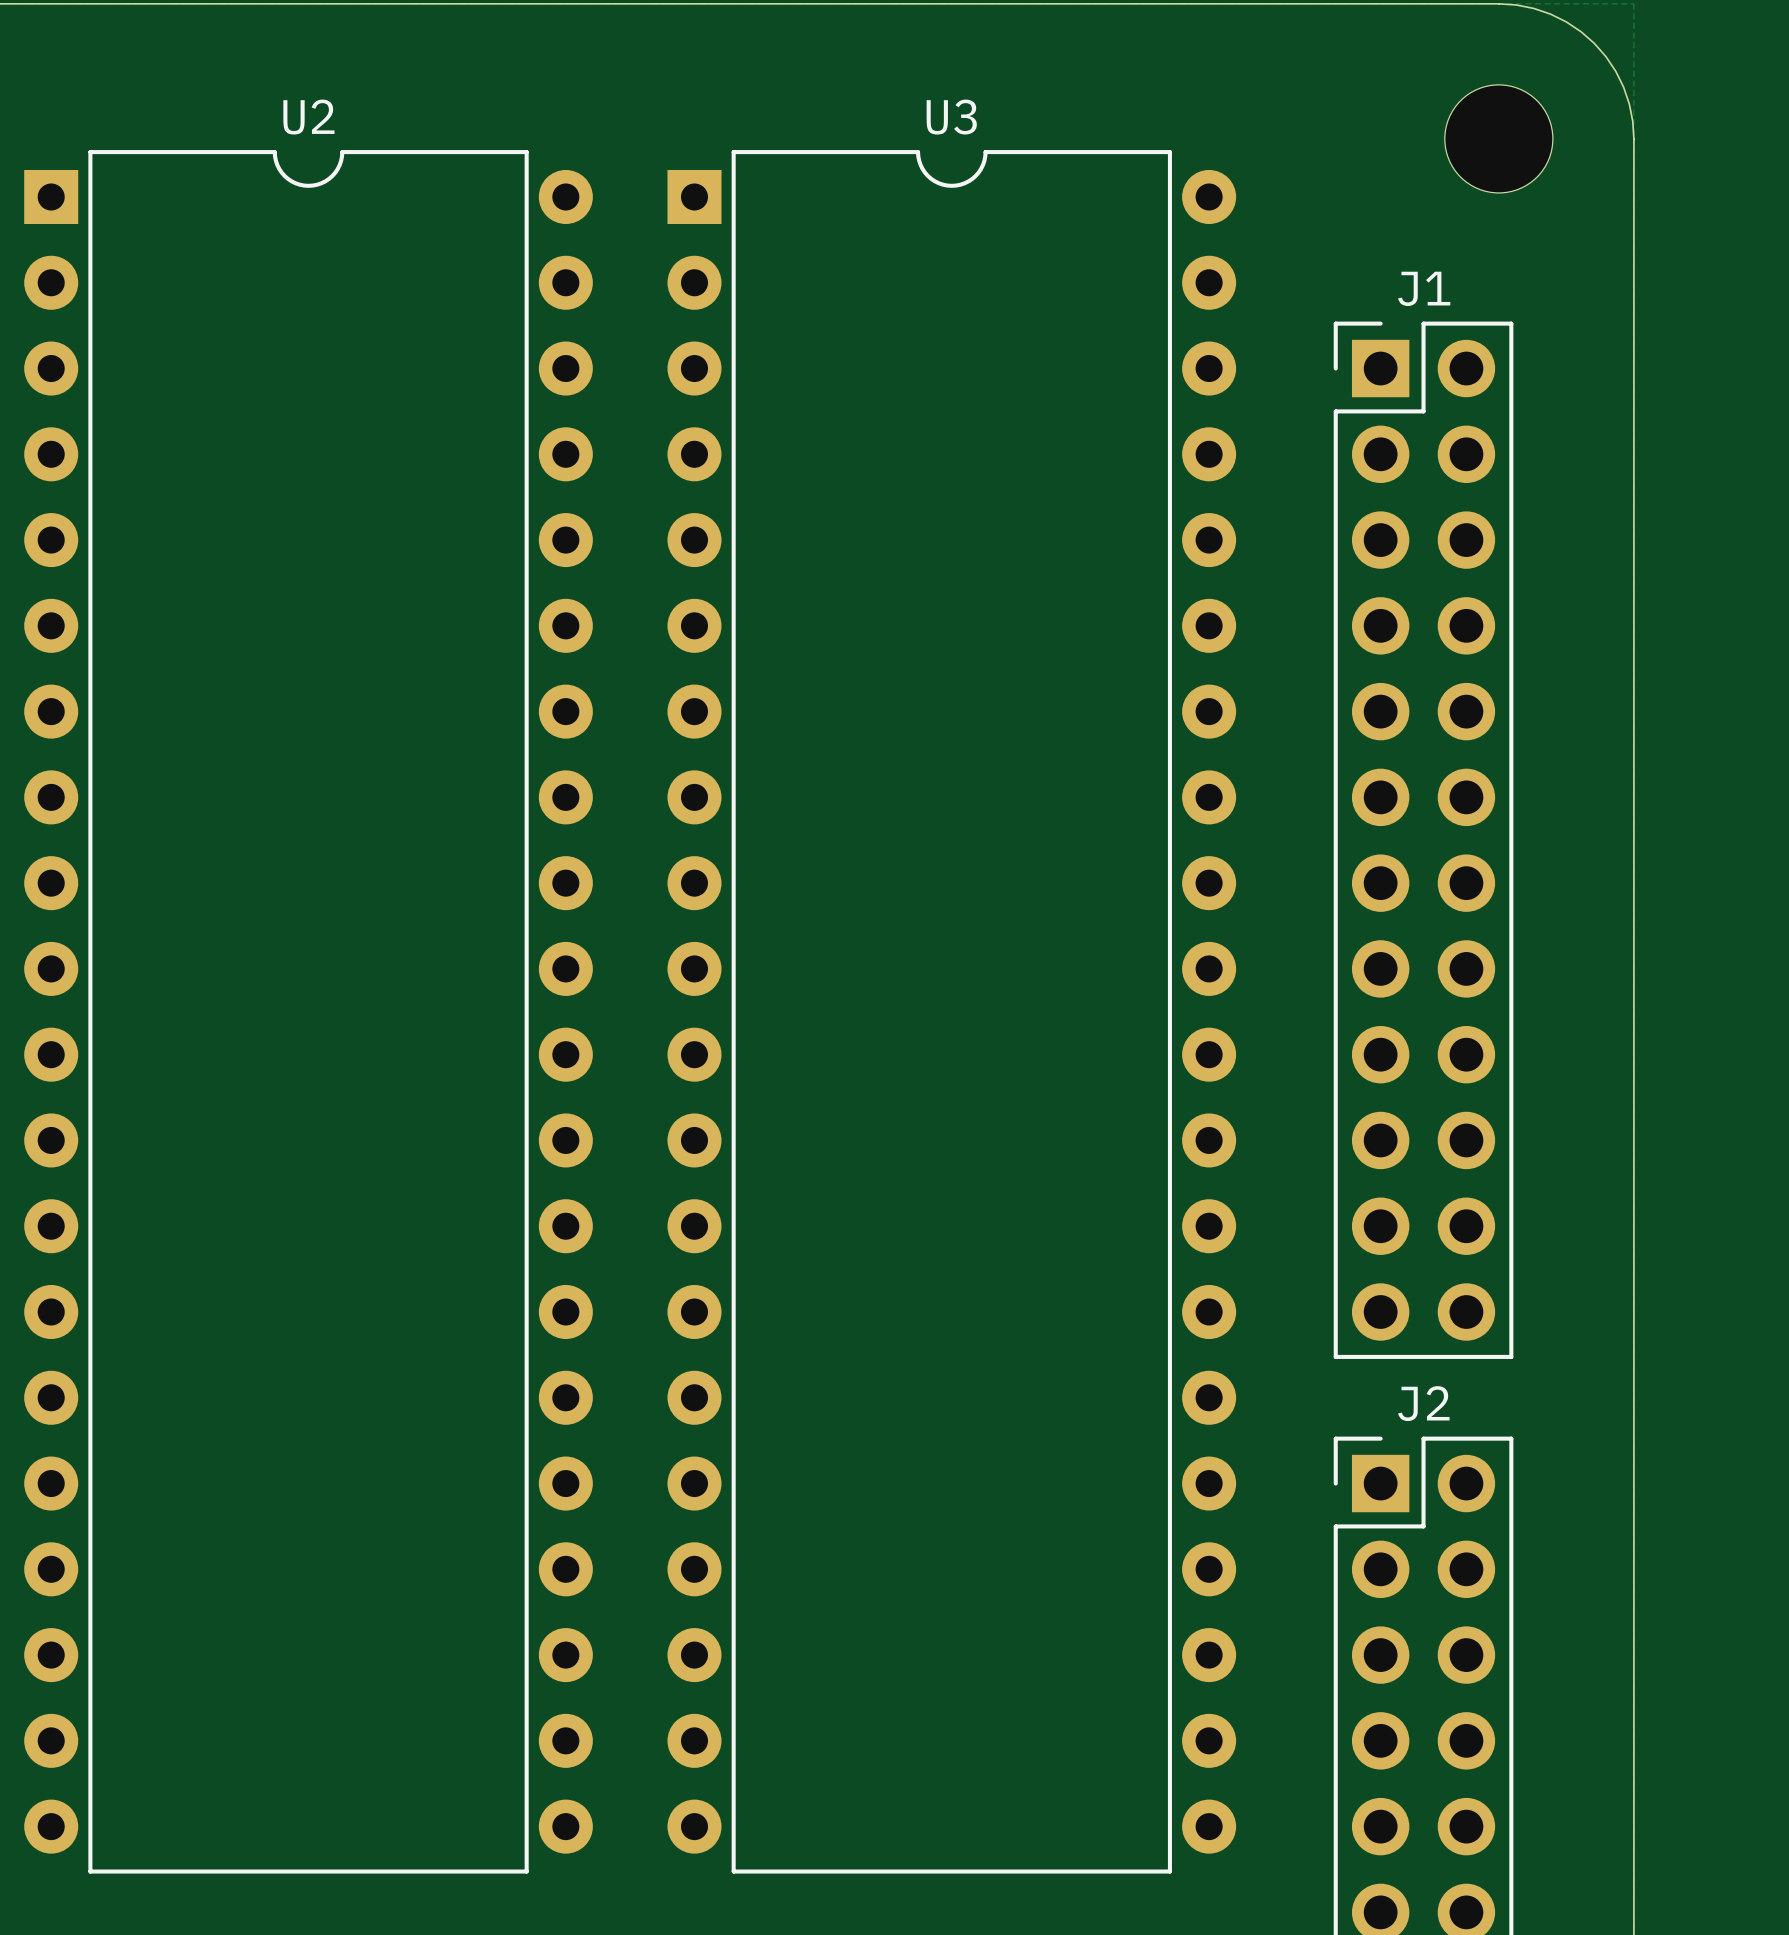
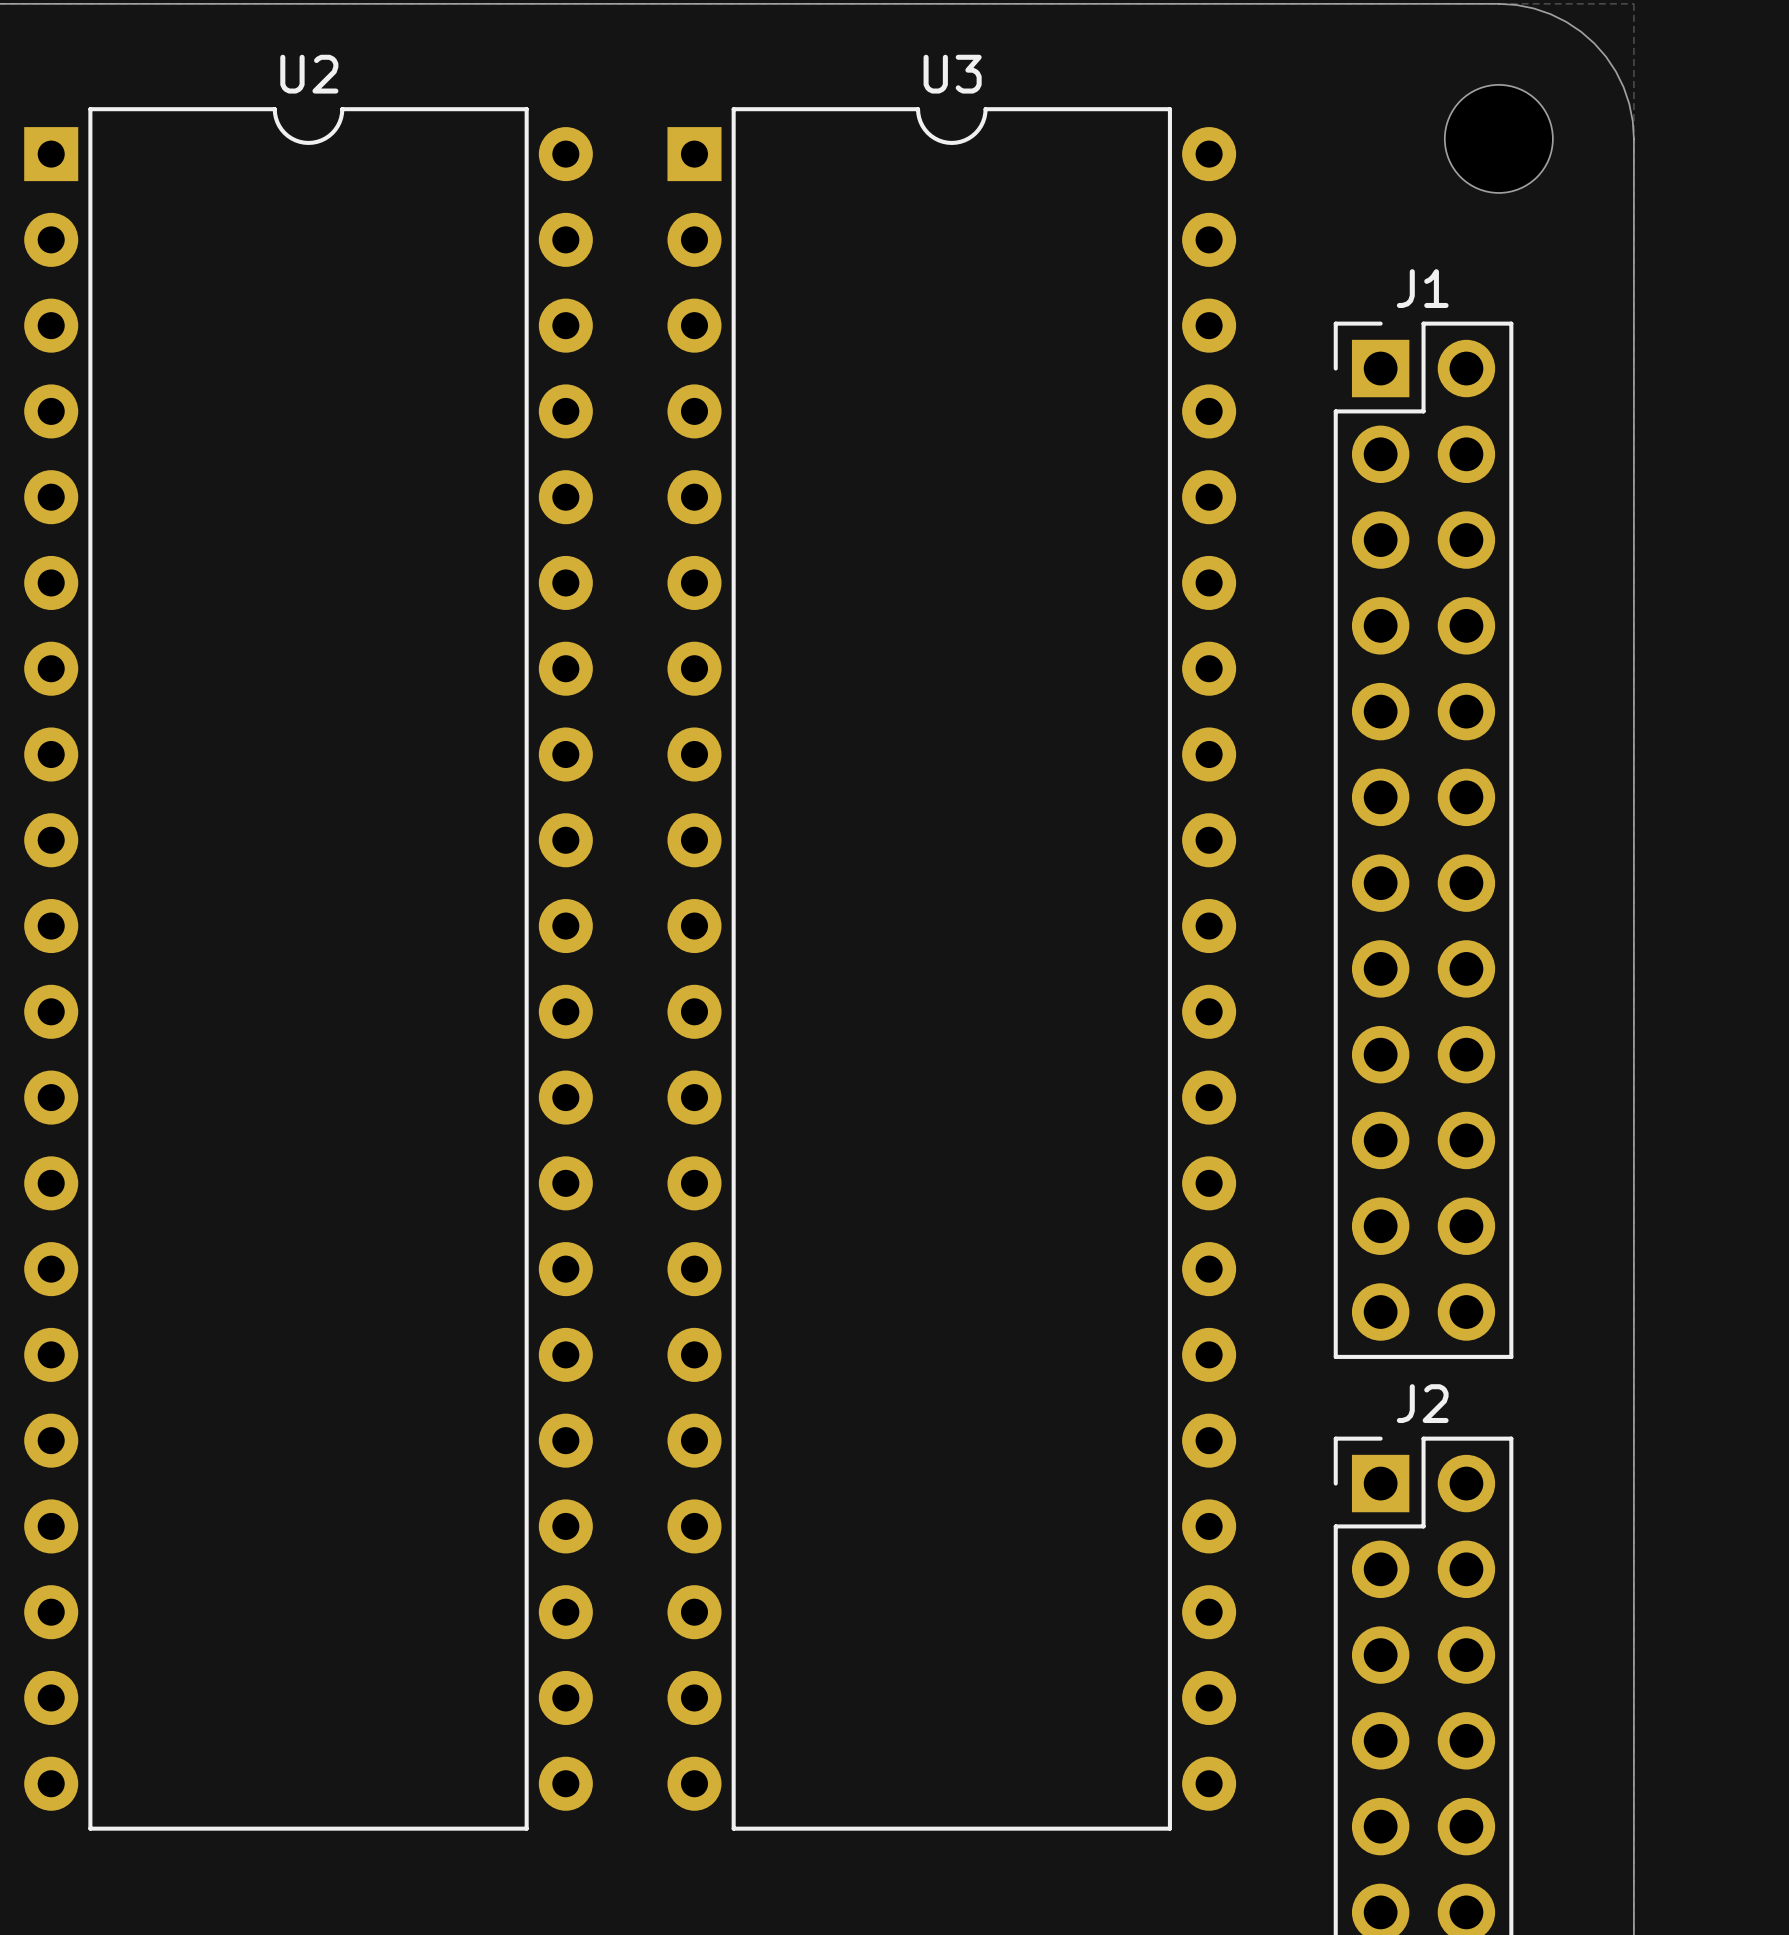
U2 position: (308, 1011) -> (308, 968)
U3 position: (951, 1011) -> (951, 968)

